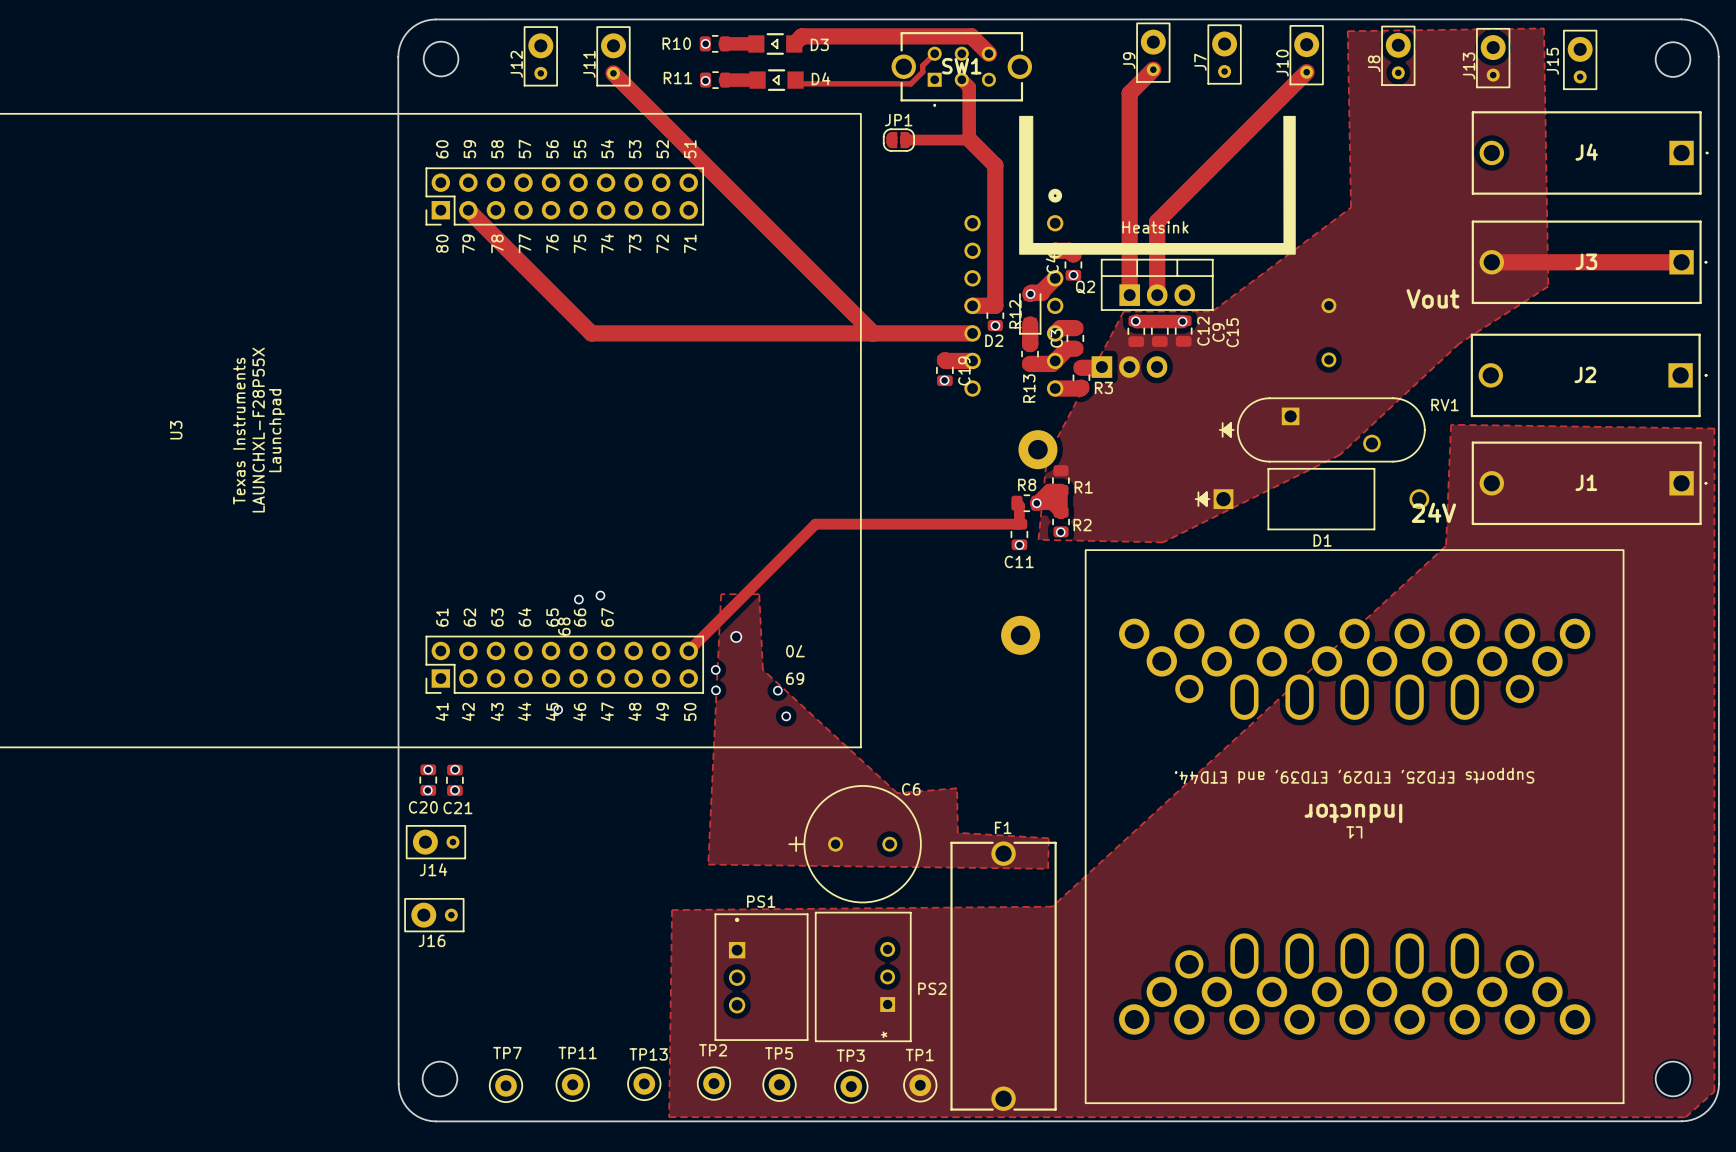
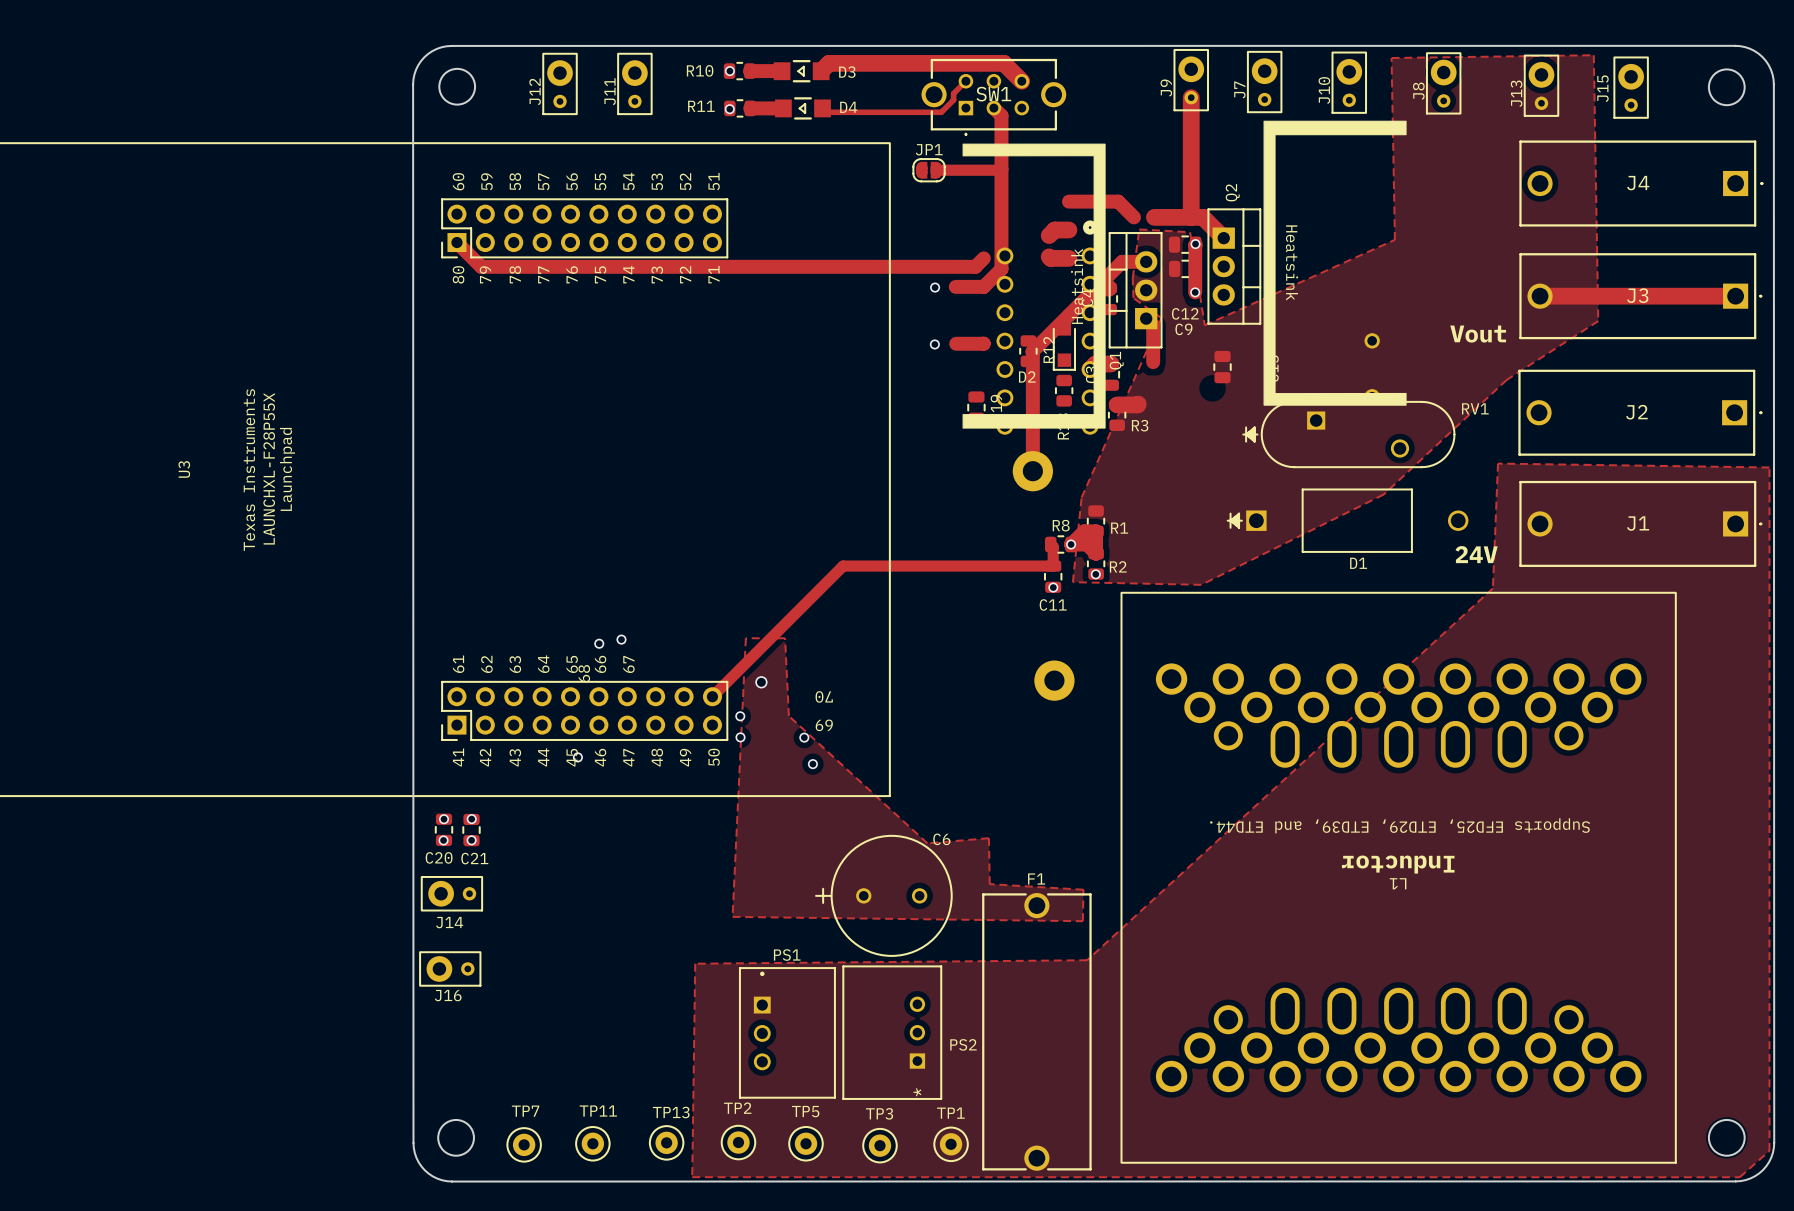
track: (1153, 69) (1129, 93) (1129, 295) -> (1191, 97) (1191, 217)
track: (1306, 72) (1157, 221) (1157, 295) -> none
track: (613, 73) (872, 333) -> none
drawing: none -> [1263, 120, 1407, 406]
drawing: none -> [962, 143, 1106, 429]
drawing: [1019, 115, 1296, 255] -> none
track: (969, 139) (995, 165) (995, 305) (972, 305) -> (1001, 169) (1001, 269) (983, 286) (955, 286)
track: none -> (1068, 201) (1118, 201) (1134, 217)
track: none -> (1154, 217) (1202, 217) (1223, 238)
track: none -> (1068, 230) (1054, 230) (1049, 235)
zone outline: (1351, 207) (1212, 311) (1123, 311) (1046, 457) -> (1394, 239) (1204, 325) (1190, 232) (1139, 229) (1132, 278) (1133, 298) (1161, 318) (1081, 497)
track: none -> (456, 242) (481, 266) (975, 266) (983, 258)
track: (468, 210) (591, 333) (972, 333) -> none
via: none -> (1195, 244)
track: none -> (1195, 244) (1195, 292)
track: none -> (1049, 256) (1068, 258)
track: none -> (1146, 261) (1122, 261) (1032, 351) (1032, 471)
via: none -> (935, 287)
via: none -> (1195, 292)
via: (1073, 275) -> none
track: (1055, 278) (1042, 292) (1030, 294) -> none
track: none -> (1146, 318) (1153, 325) (1153, 362)
Q2 rotation: 0° (1157, 284) -> 90° clockwise (1234, 266)
via: (1030, 294) -> none
track: none -> (983, 343) (956, 343)
via: none -> (934, 344)
via: (1135, 321) -> none
track: (1136, 321) (1182, 321) -> none
via: (1182, 321) -> none
track: (1030, 324) (1030, 344) -> none
via: (995, 325) -> none
C12 rotation: 0° (1136, 331) -> 90° clockwise (1185, 244)
C12 position: (1136, 331) -> (1185, 244)
C9 rotation: 0° (1159, 331) -> 90° clockwise (1185, 268)
C9 position: (1159, 331) -> (1185, 268)
track: (1075, 348) (1067, 348) (1052, 363) (1030, 363) -> none
track: (944, 360) (972, 360) -> none
Q1 side: bottom (1129, 367) -> top (1135, 290)
via: (944, 380) -> none
track: (1081, 387) (1055, 388) -> none
RV1 position: (1322, 429) -> (1348, 434)
part position: (1037, 449) -> (1032, 471)
D1 position: (1312, 499) -> (1347, 520)

